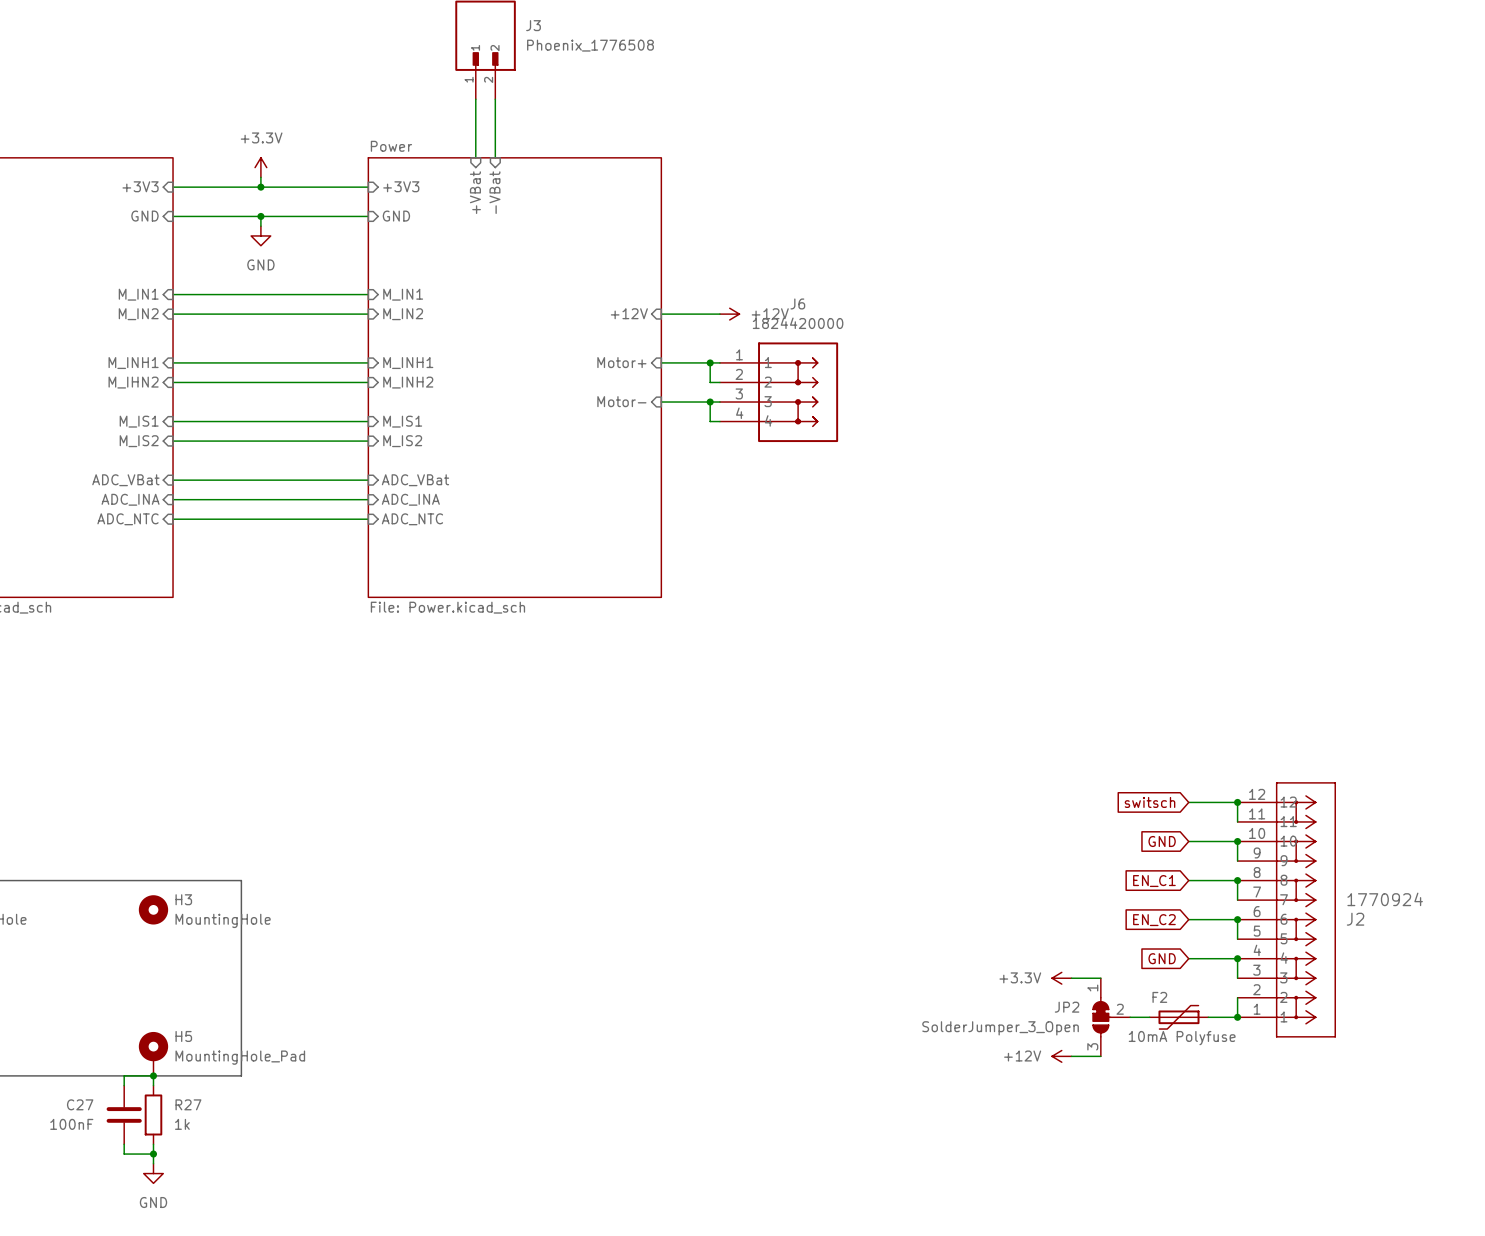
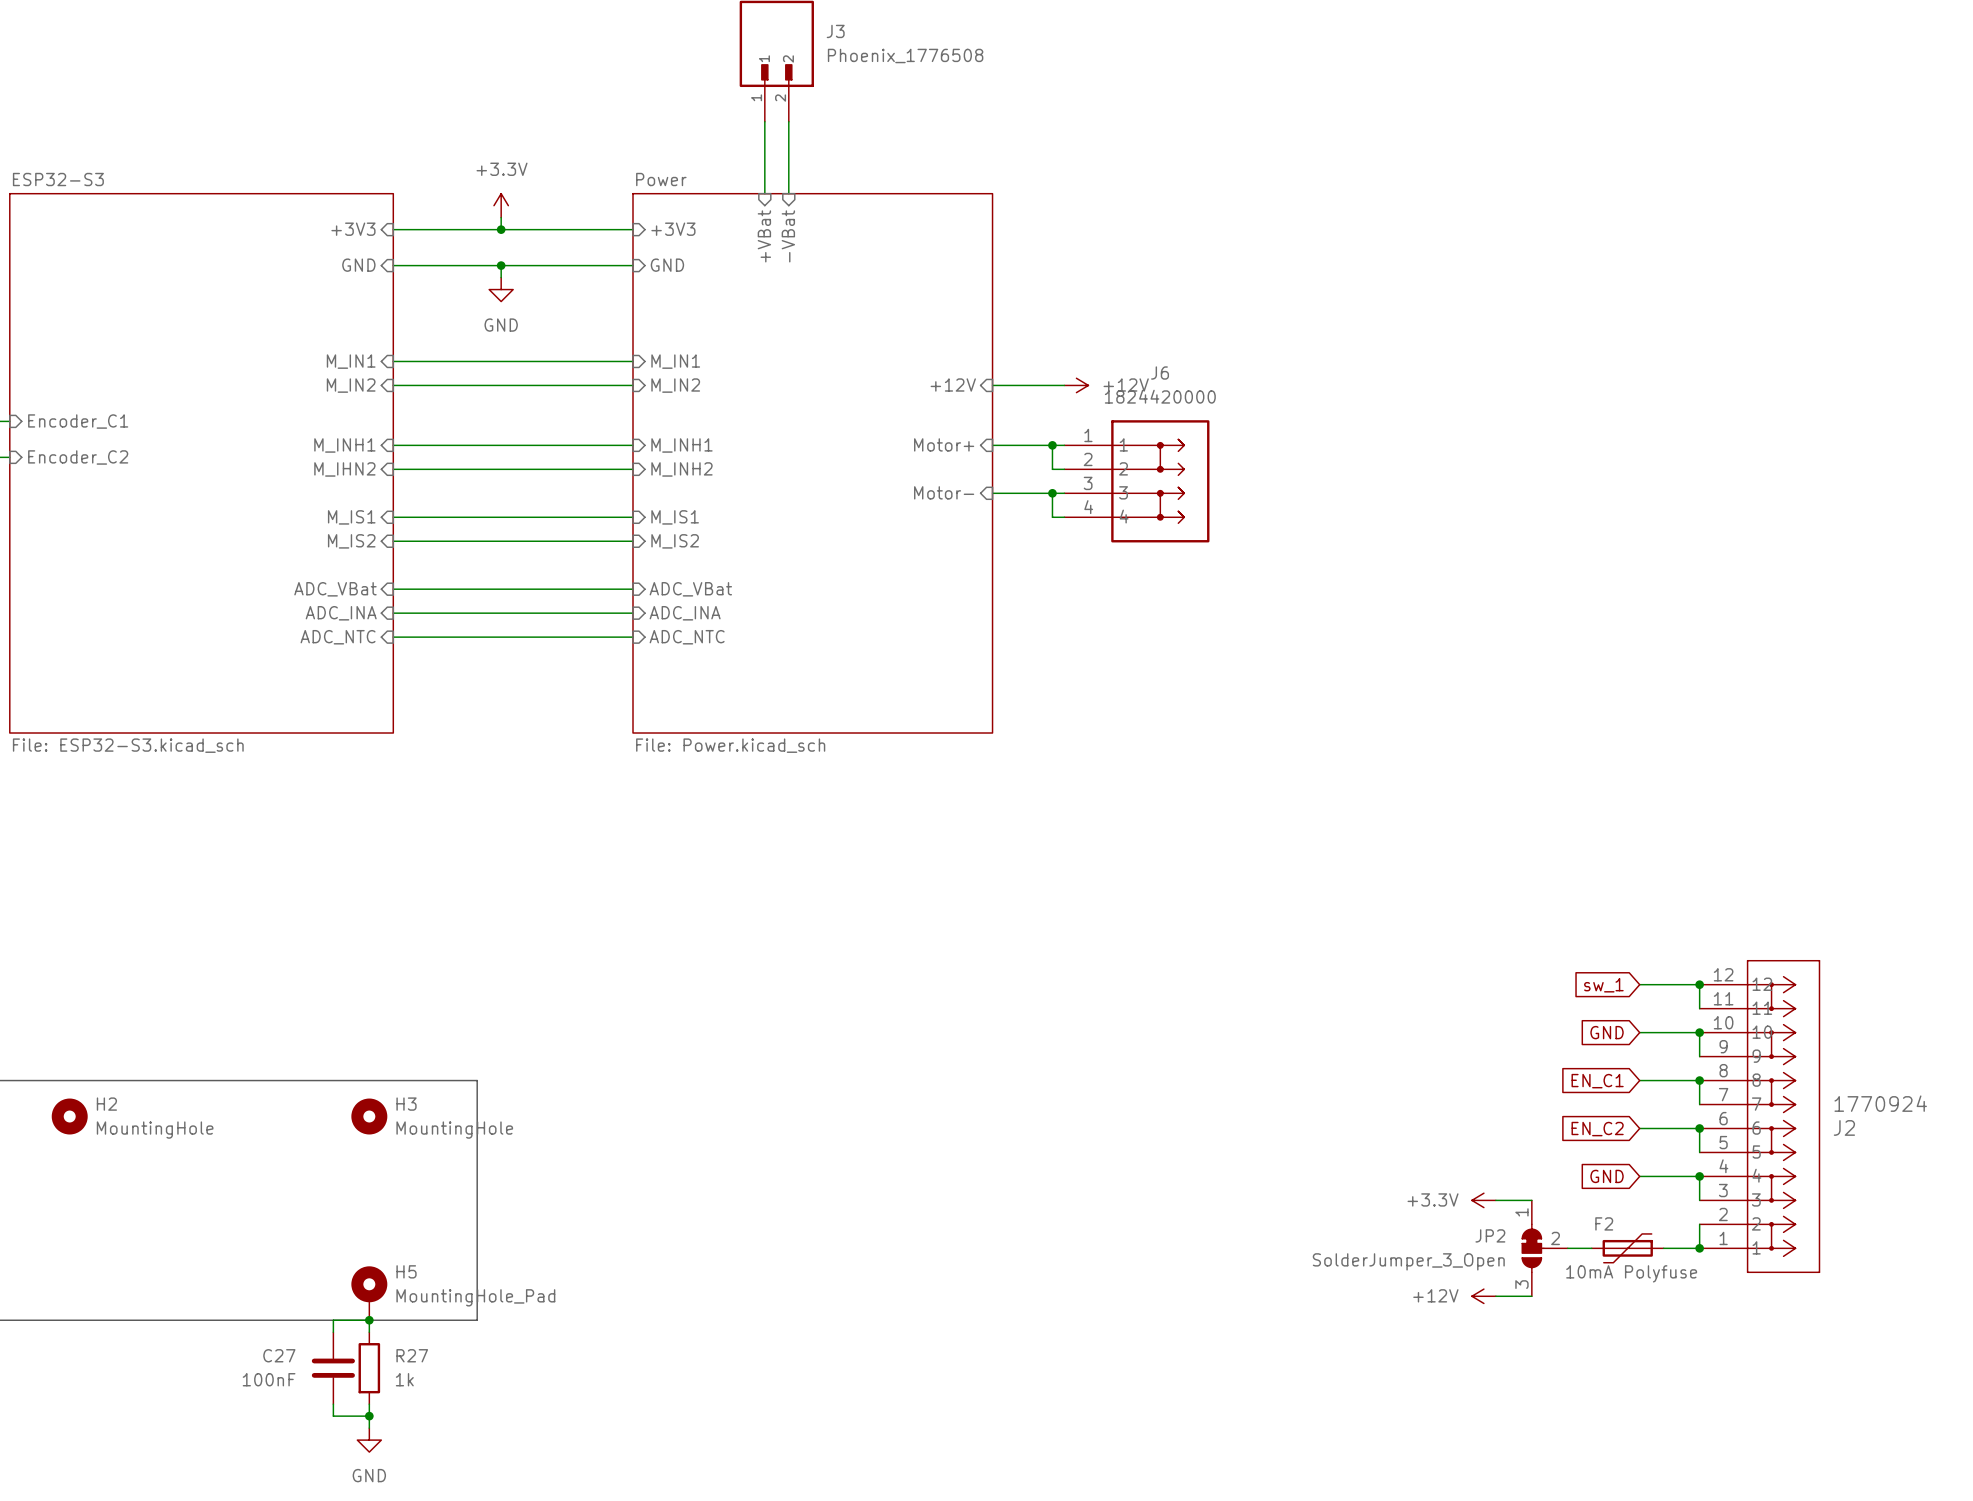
global label: switsch (1150, 802) -> sw_1 (1603, 985)

